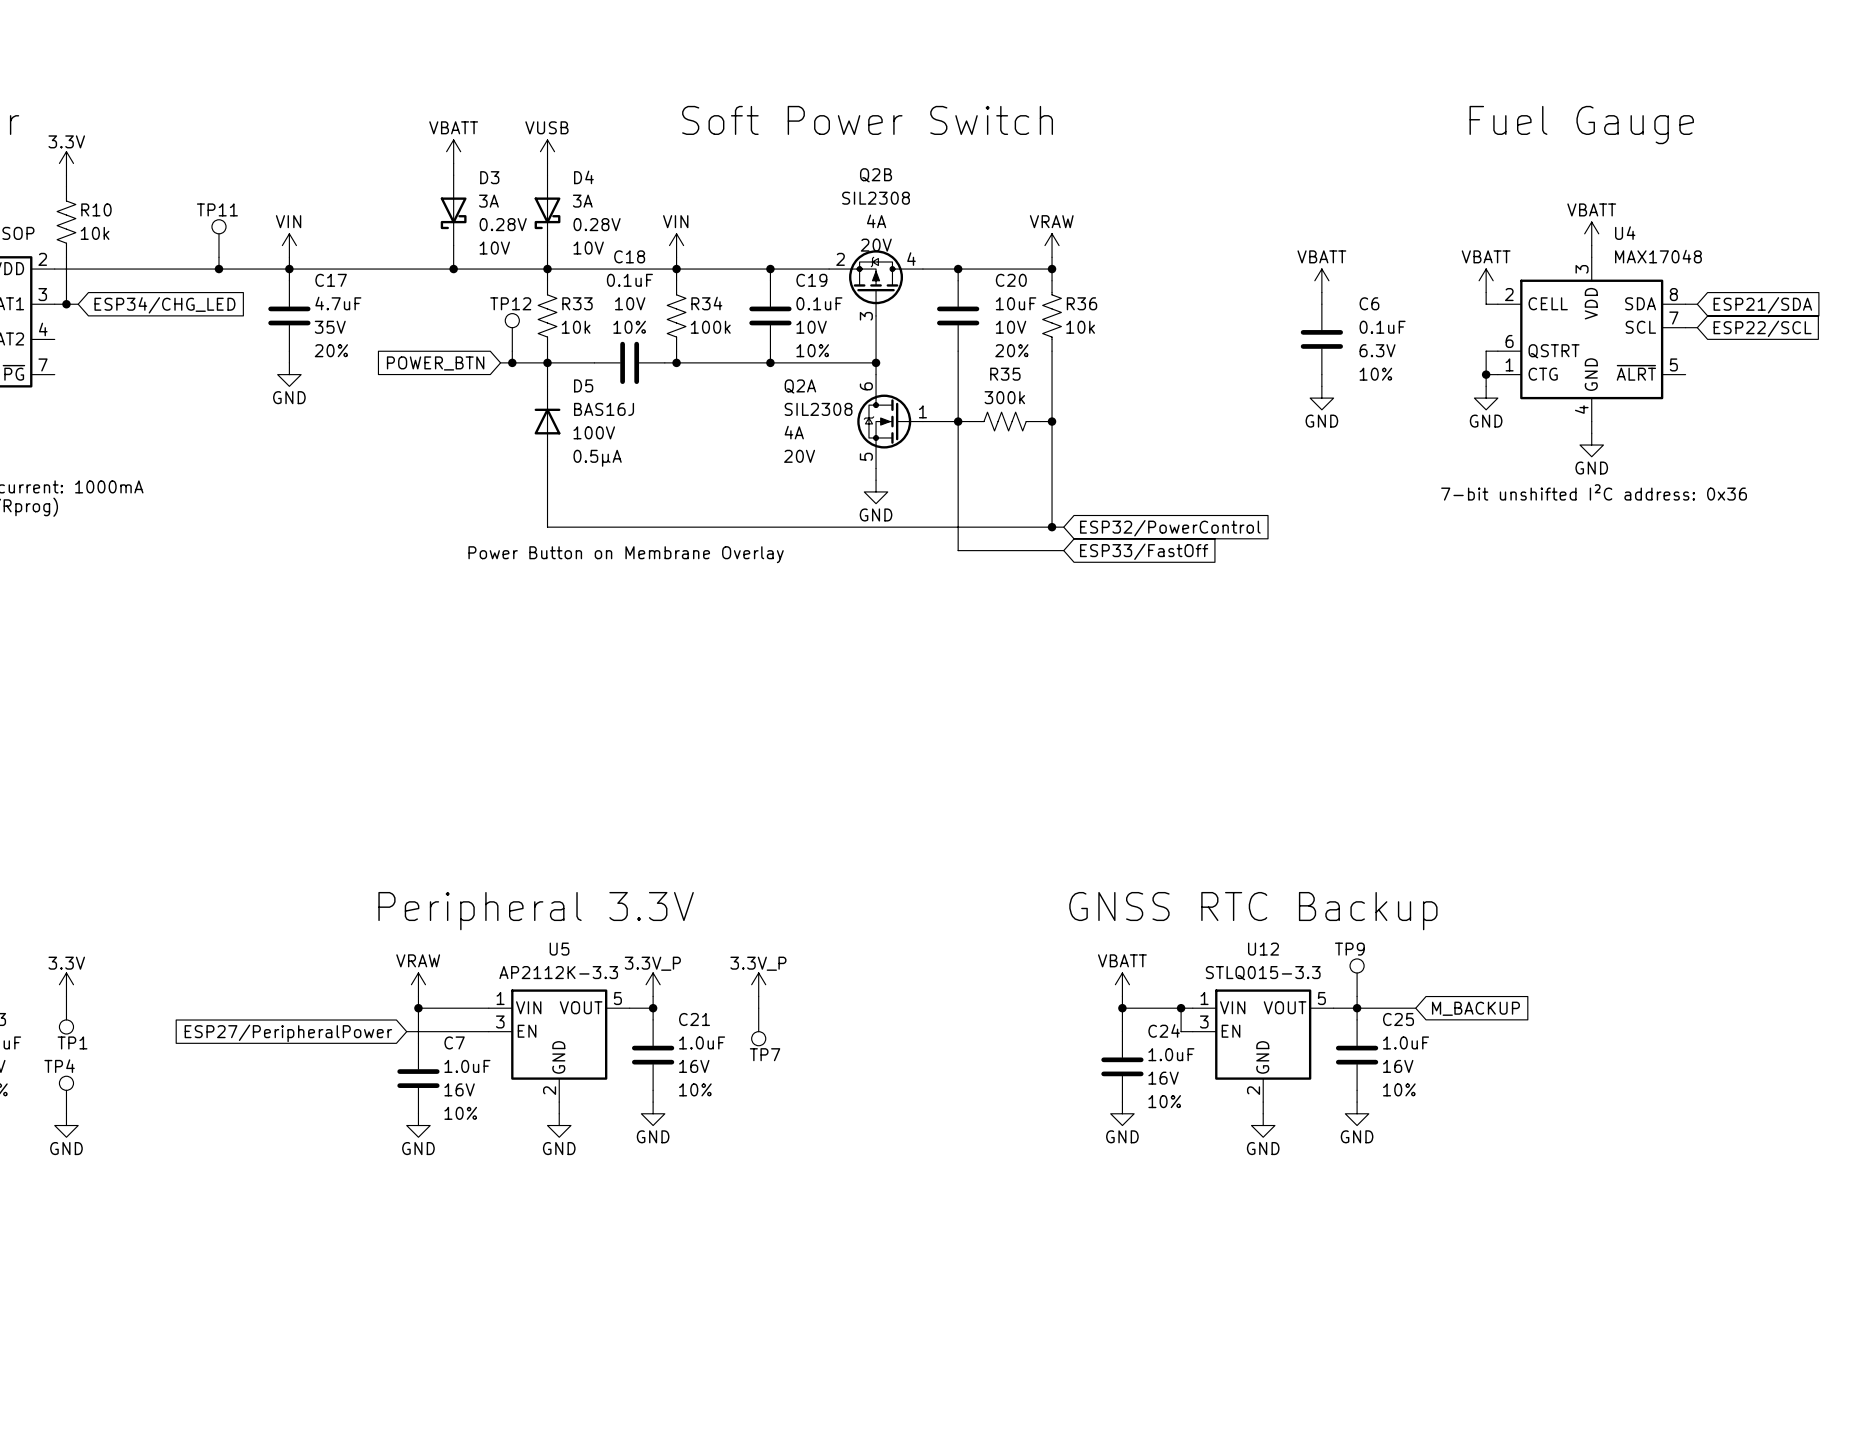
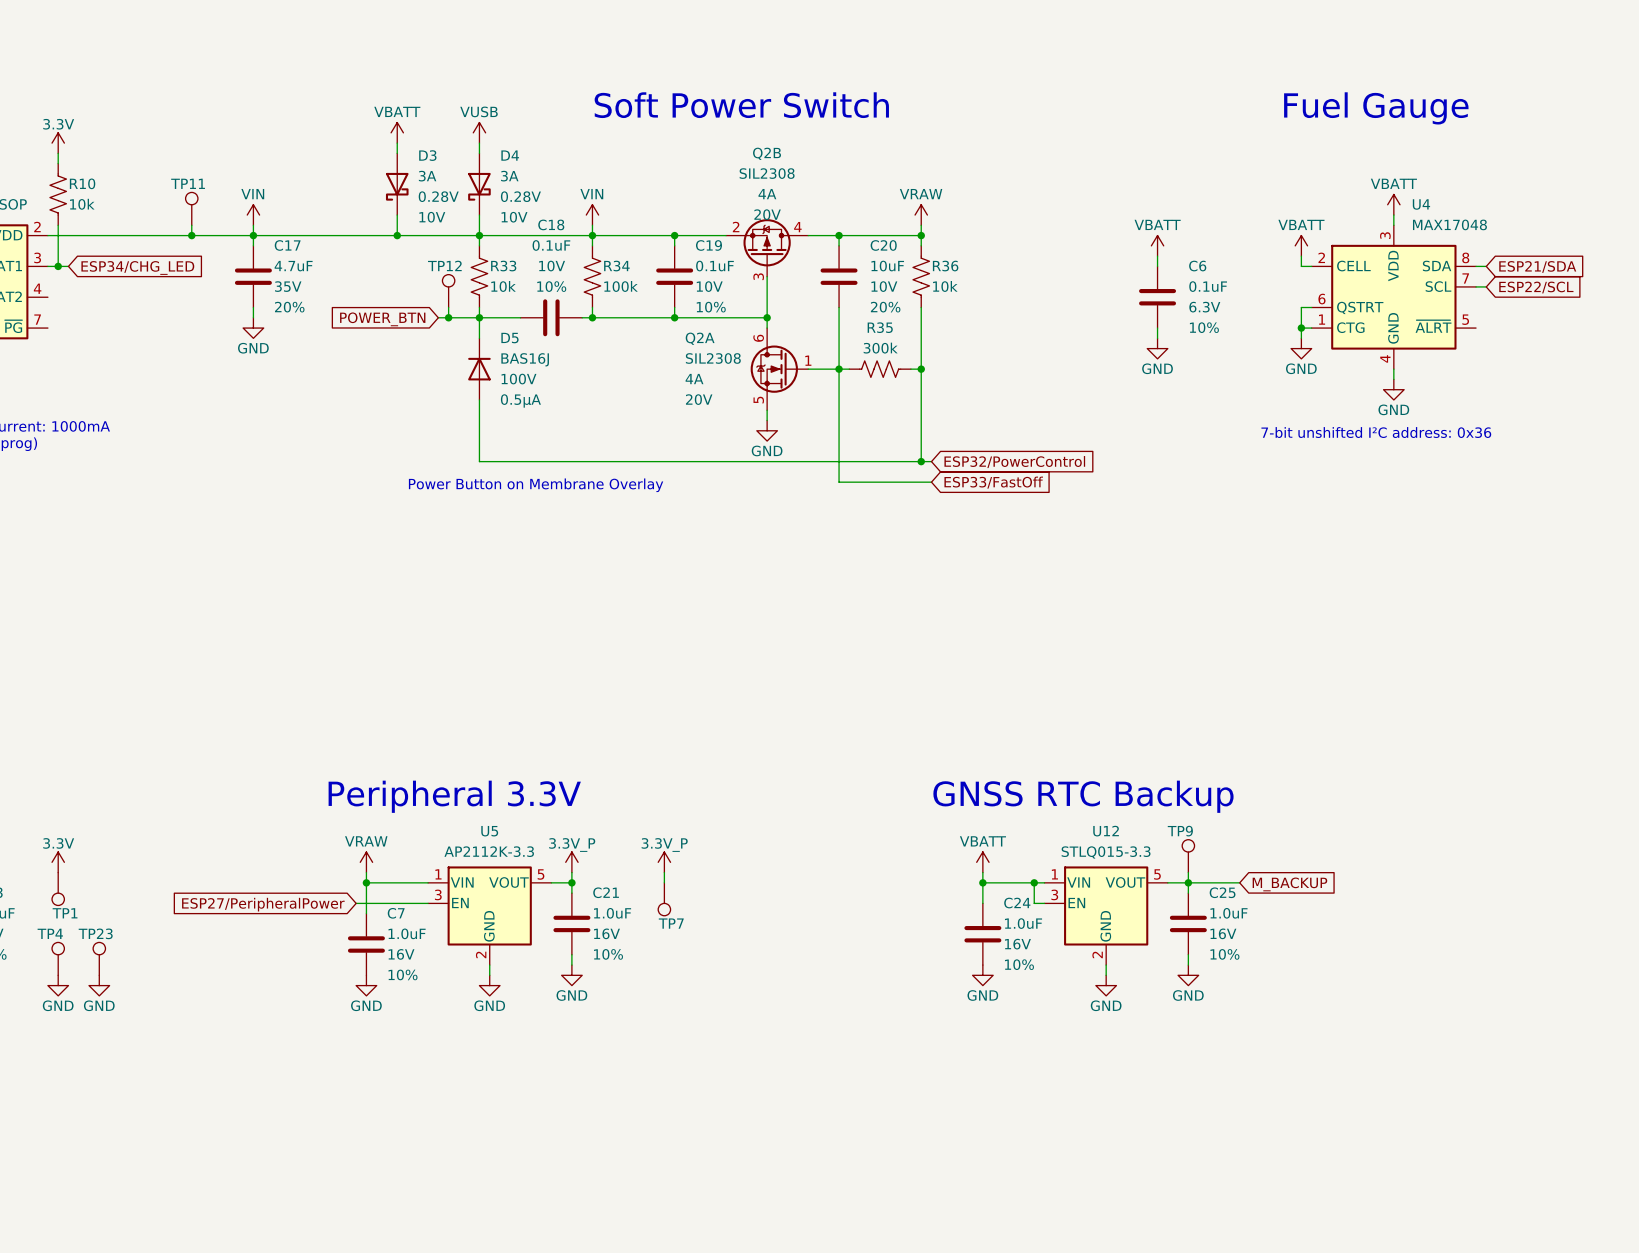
TP23: none -> (99, 958)
power symbol: none -> GND (99, 985)

